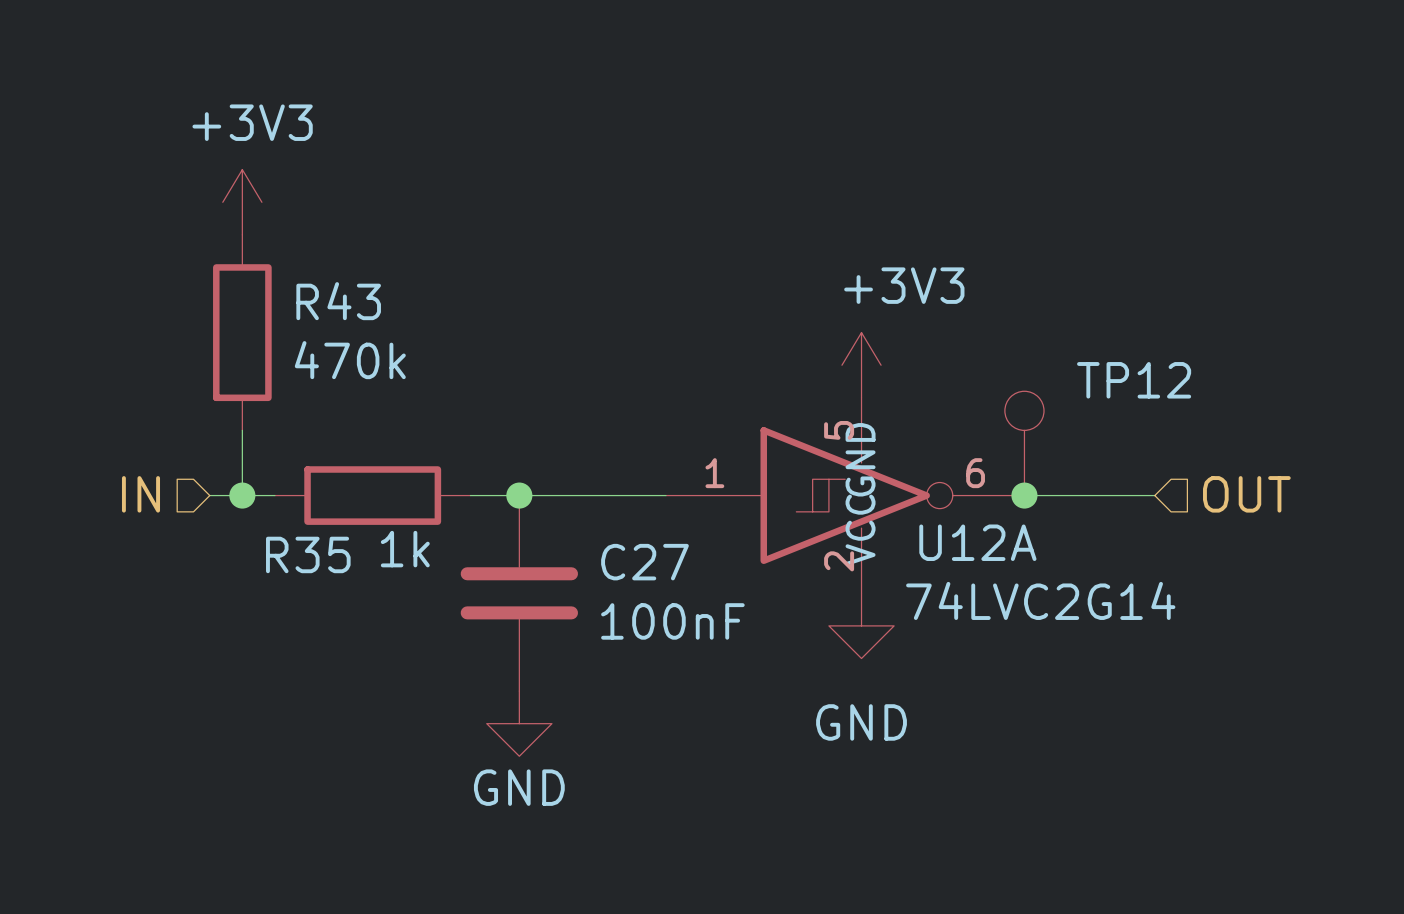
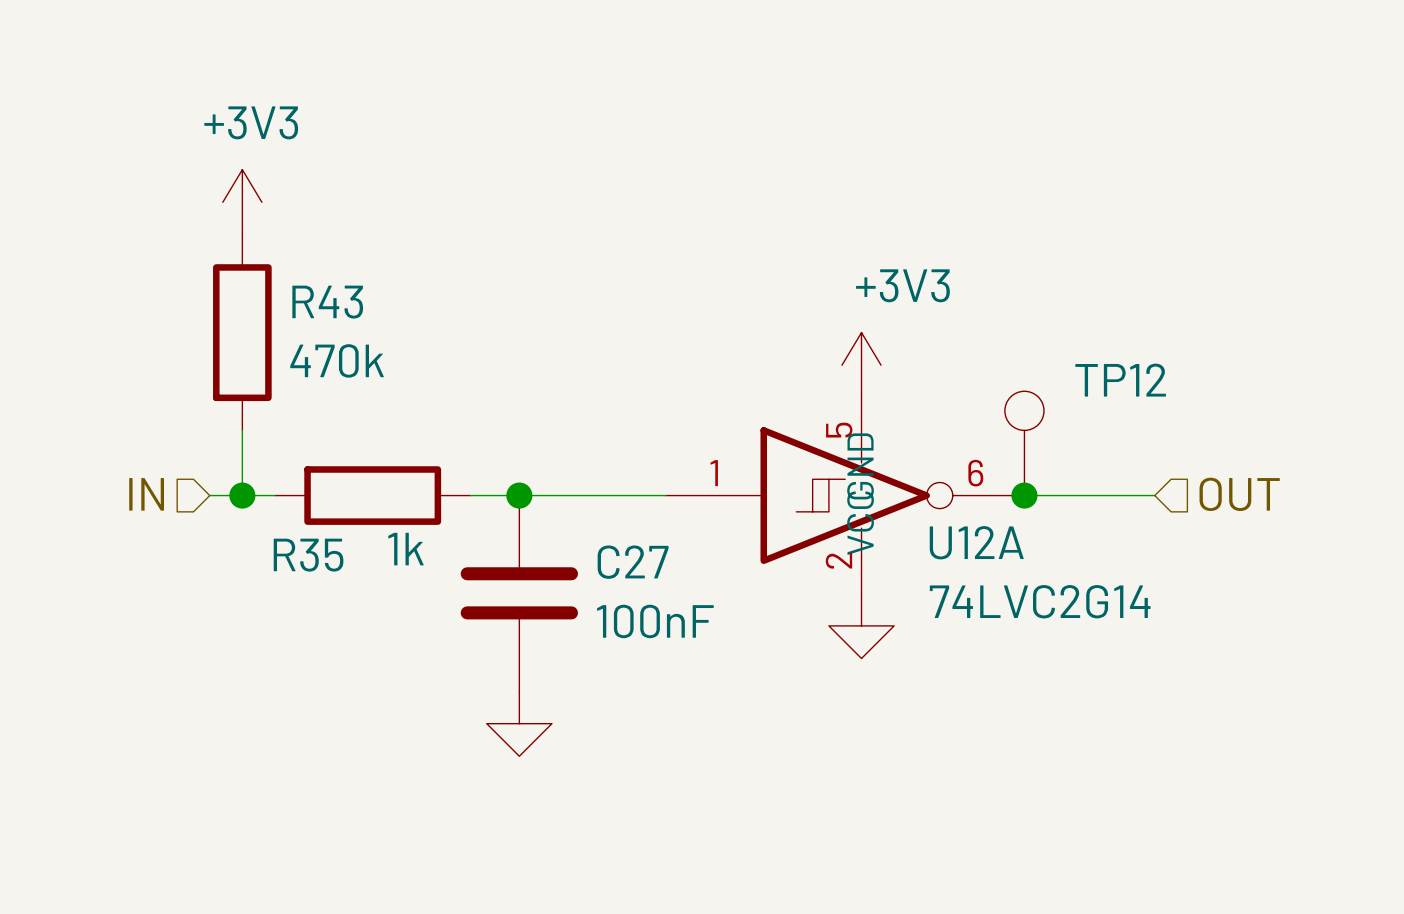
power symbol text: GND (861, 722) -> none
power symbol text: GND (519, 787) -> none

